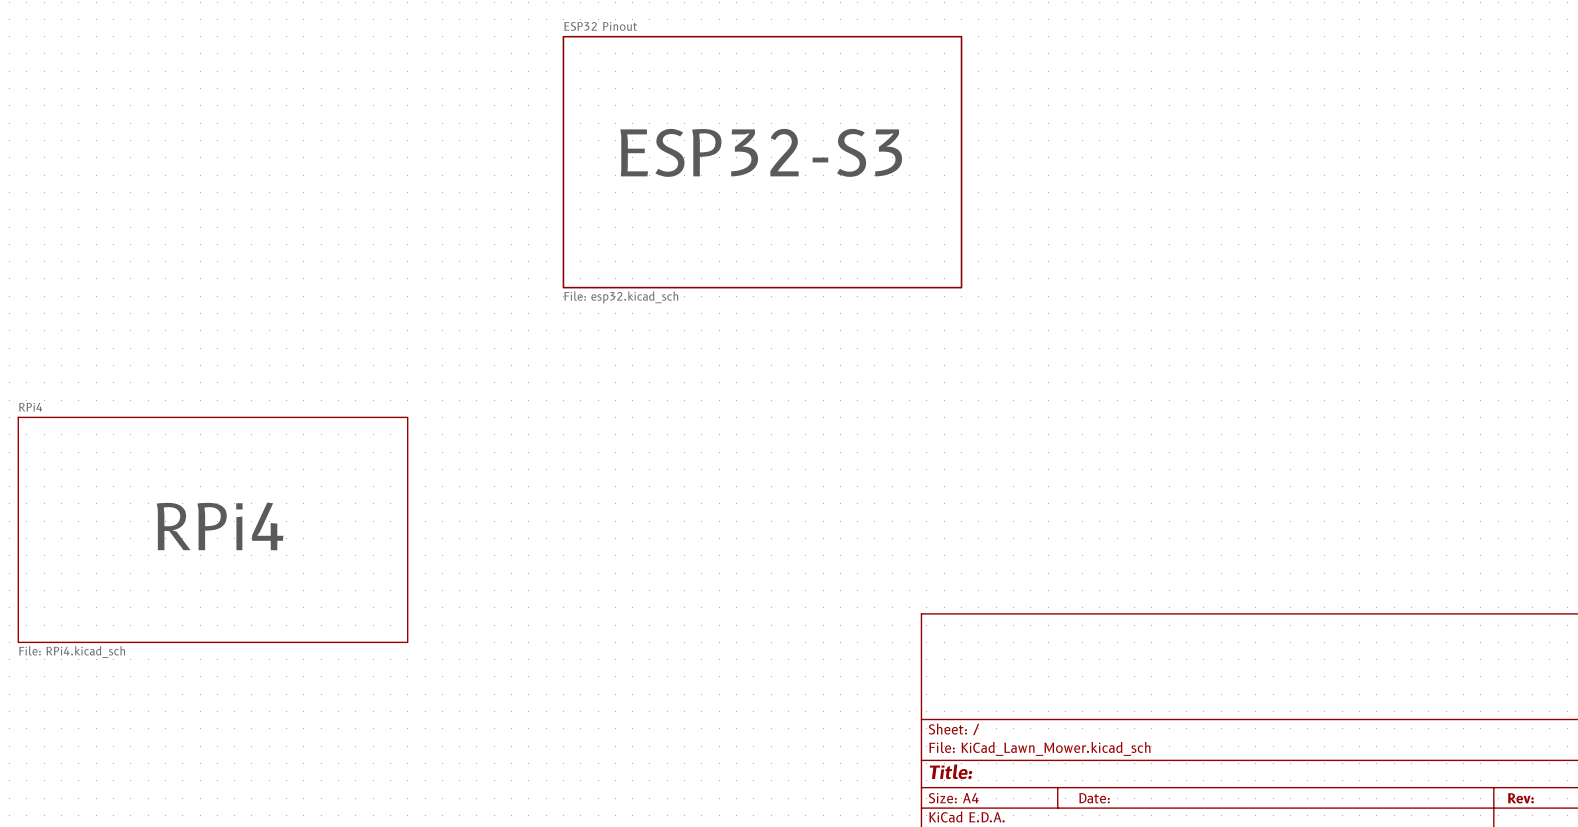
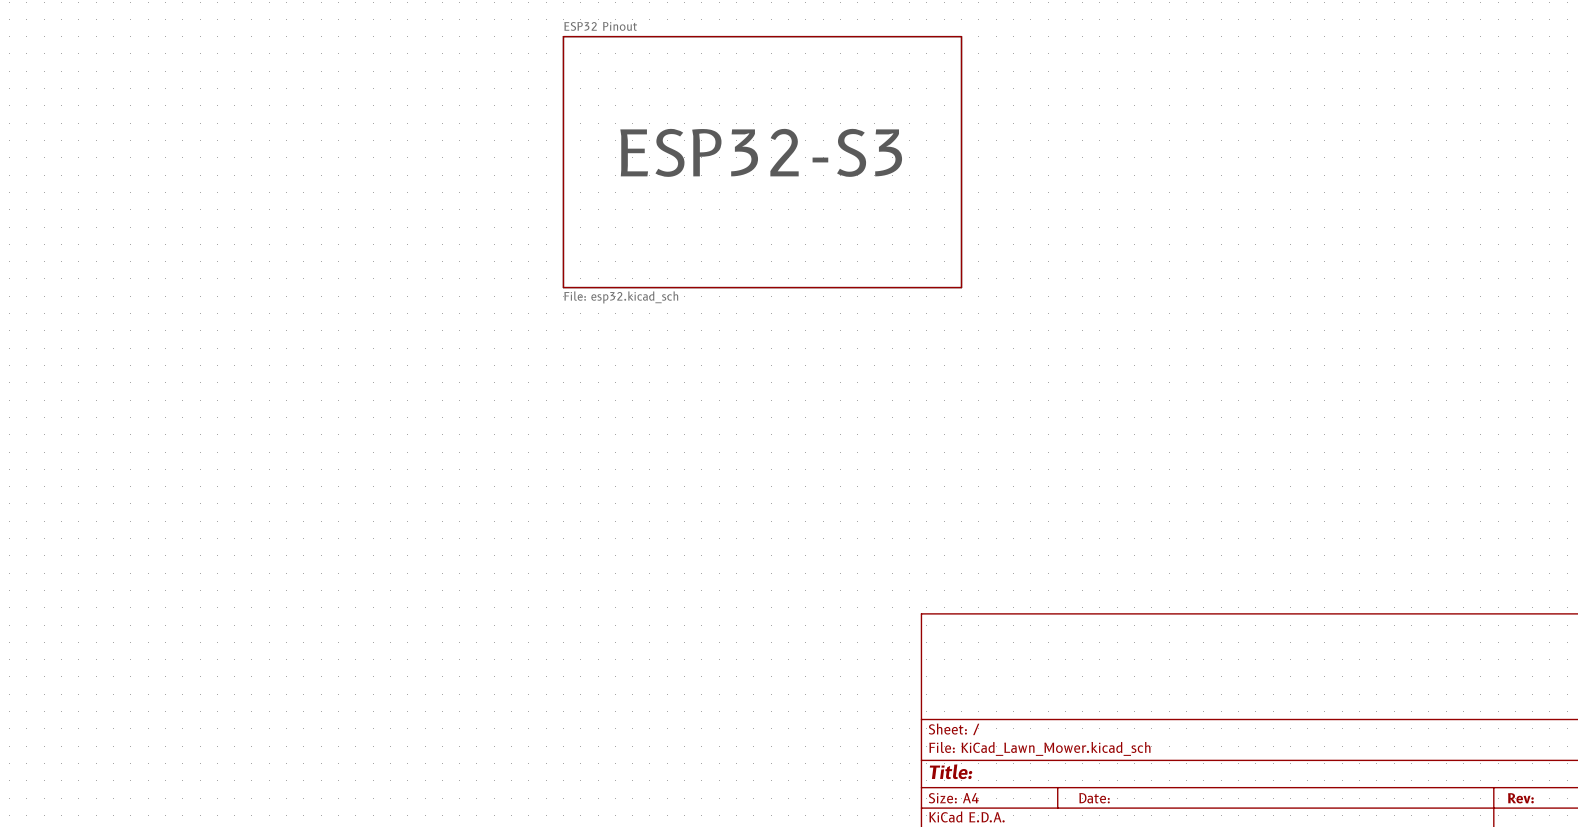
text: RPi4 (220, 526) -> none
sheet RPi4: File: RPi4.kicad_sch (212, 529) -> none

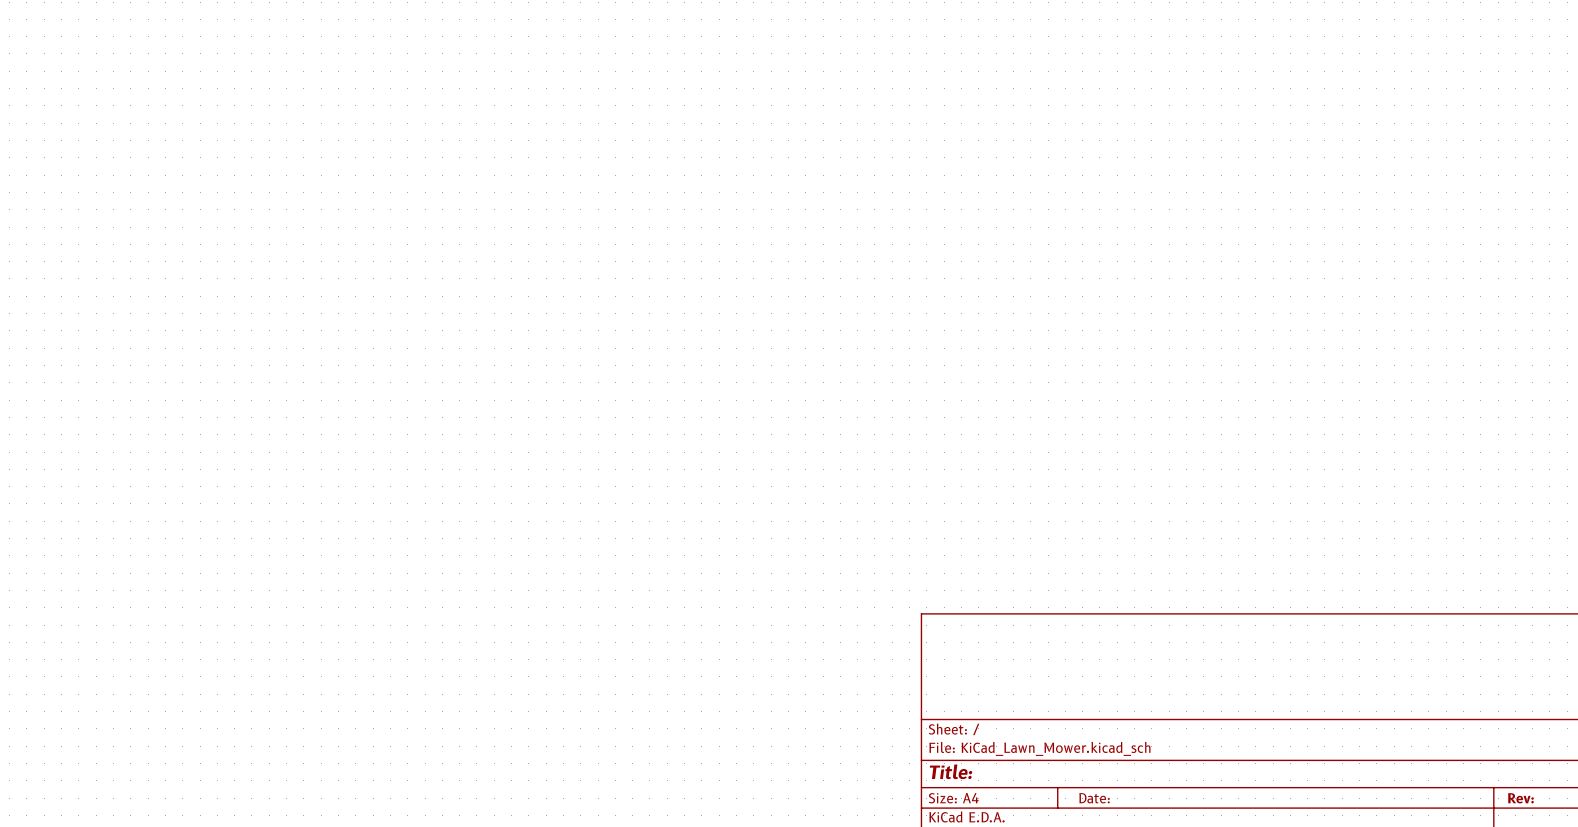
text: ESP32-S3 (761, 152) -> none
sheet ESP32 Pinout: File: esp32.kicad_sch (762, 162) -> none

